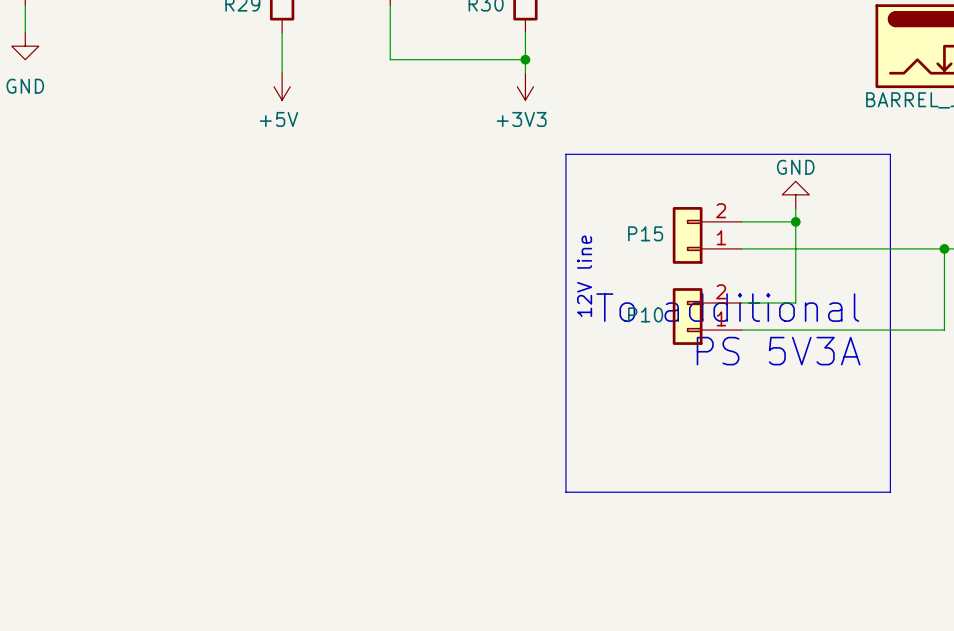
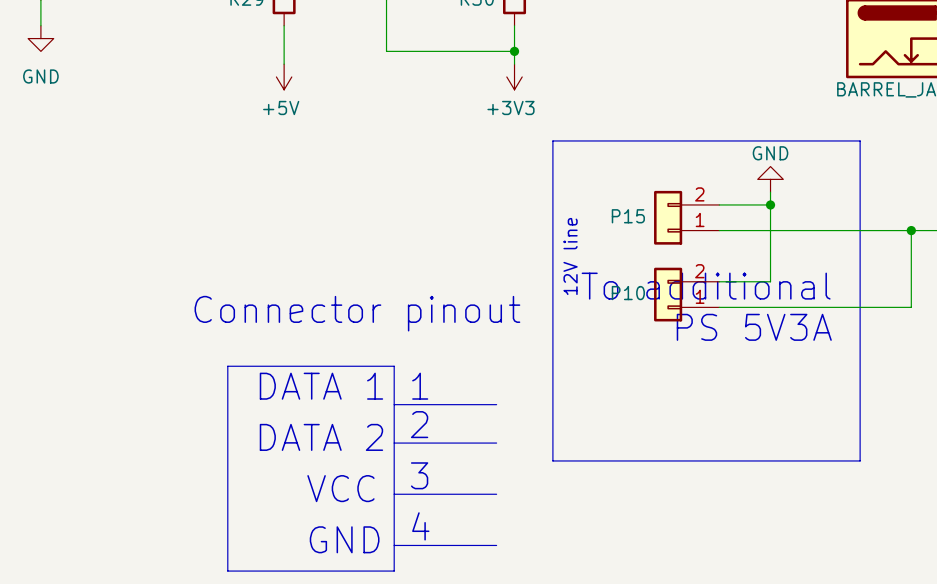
text: none -> Connector pinout (357, 313)
line: none -> (227, 366) (394, 366) (394, 571) (227, 571) (227, 366)
text: none -> DATA 1 (321, 386)
text: none -> 1 (420, 386)
line: none -> (394, 404) (496, 404)
text: none -> 2 (419, 424)
text: none -> DATA 2 (321, 437)
line: none -> (394, 443) (496, 443)
text: none -> 3 (419, 475)
text: none -> VCC (340, 488)
line: none -> (394, 494) (496, 494)
text: none -> 4 (420, 526)
text: none -> GND (344, 539)
line: none -> (394, 545) (496, 545)

